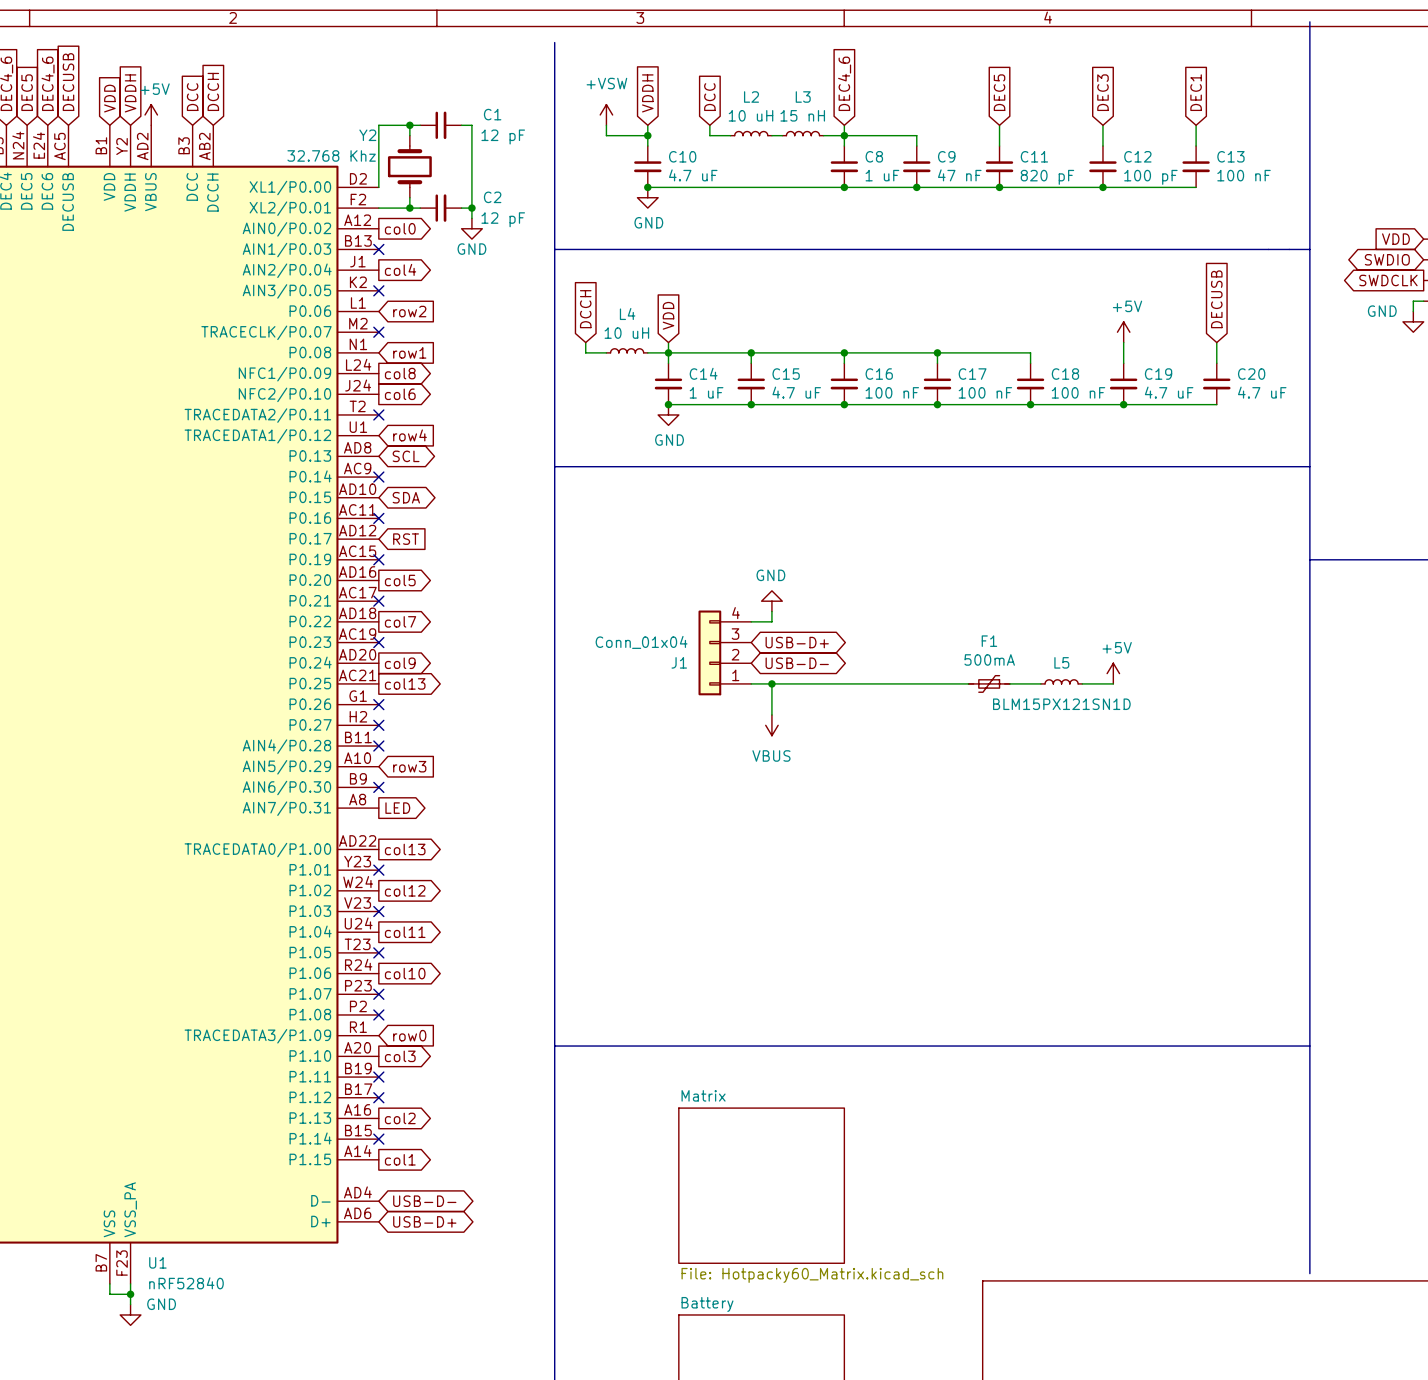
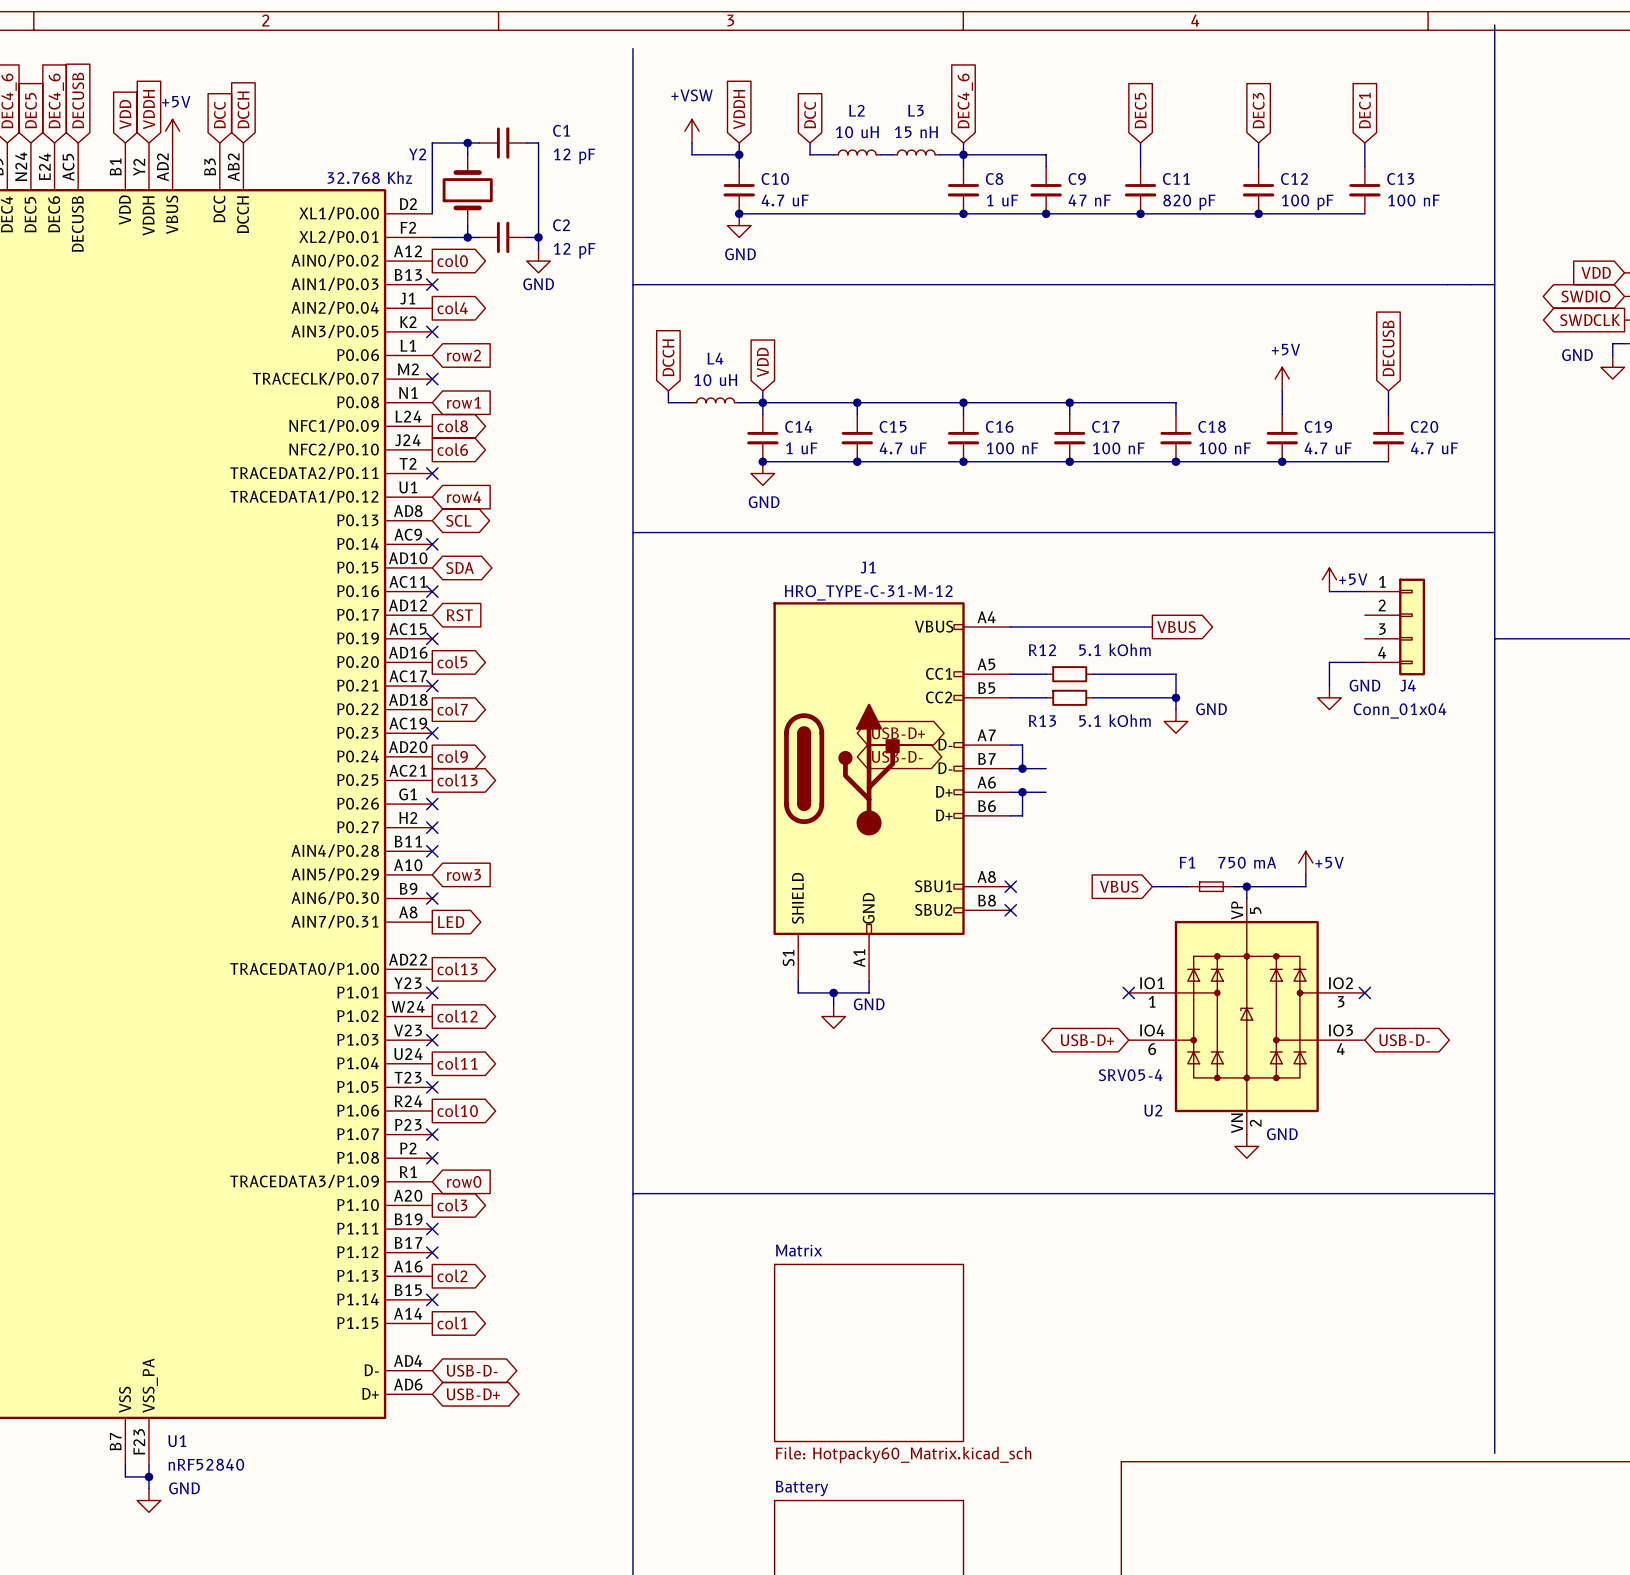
power symbol: none -> +5V (1329, 579)
wire: none -> (1010, 626) (1152, 626)
global label: none -> VBUS (1176, 627)
J4: none -> Conn_01x04 (1394, 626)
wire: none -> (1364, 662) (1329, 662) (1329, 686)
wire: none -> (1010, 674) (1046, 674)
R12: none -> 5.1 kOhm (1069, 674)
wire: none -> (1093, 674) (1175, 674) (1175, 709)
power symbol: GND (771, 601) -> none
J1 symbol: [698, 610, 752, 696] -> [773, 602, 1011, 982]
wire: none -> (1010, 697) (1046, 697)
R13: none -> 5.1 kOhm (1069, 697)
wire: none -> (1093, 697) (1175, 697)
junction: none -> (1175, 697)
power symbol: none -> GND (1329, 697)
power symbol: none -> GND (1175, 721)
F1 name position: F1 (989, 641) -> F1 (1187, 862)
J1 value: Conn_01x04 (641, 642) -> HRO_TYPE-C-31-M-12 (868, 592)
wire: none -> (1010, 745) (1022, 745) (1022, 768)
F1 value: 500mA (989, 659) -> 750 mA (1247, 862)
J1 name position: J1 (679, 662) -> J1 (868, 567)
wire: none -> (1010, 768) (1046, 768)
junction: none -> (1022, 768)
power symbol: +5V (1113, 673) -> none
F1 symbol: [968, 675, 1010, 693] -> [1187, 881, 1236, 892]
L5: BLM15PX121SN1D (1061, 681) -> none
wire: (751, 683) (968, 683) -> none
junction: (771, 683) -> none
wire: (1009, 683) (1040, 683) -> (1152, 886) (1187, 886)
wire: (1082, 683) (1113, 683) -> (1329, 591) (1364, 591)
wire: none -> (1010, 792) (1046, 792)
wire: none -> (1022, 792) (1022, 815) (1010, 815)
junction: none -> (1022, 792)
power symbol: VBUS (771, 725) -> none
power symbol: none -> +5V (1305, 863)
wire: none -> (1305, 874) (1305, 886) (1235, 886)
no-connect mark: none -> (1010, 886)
global label: none -> VBUS (1119, 886)
wire: none -> (1246, 886) (1246, 898)
junction: none -> (1246, 886)
no-connect mark: none -> (1010, 910)
wire: none -> (798, 981) (798, 992) (869, 992) (869, 981)
wire: none -> (833, 992) (833, 1004)
junction: none -> (833, 992)
no-connect mark: none -> (1128, 992)
no-connect mark: none -> (1364, 992)
power symbol: none -> GND (833, 1016)
U2: none -> SRV05-4 (1246, 1016)
global label: none -> USB-D+ (1087, 1040)
global label: none -> USB-D- (1404, 1040)
power symbol: none -> GND (1246, 1146)

